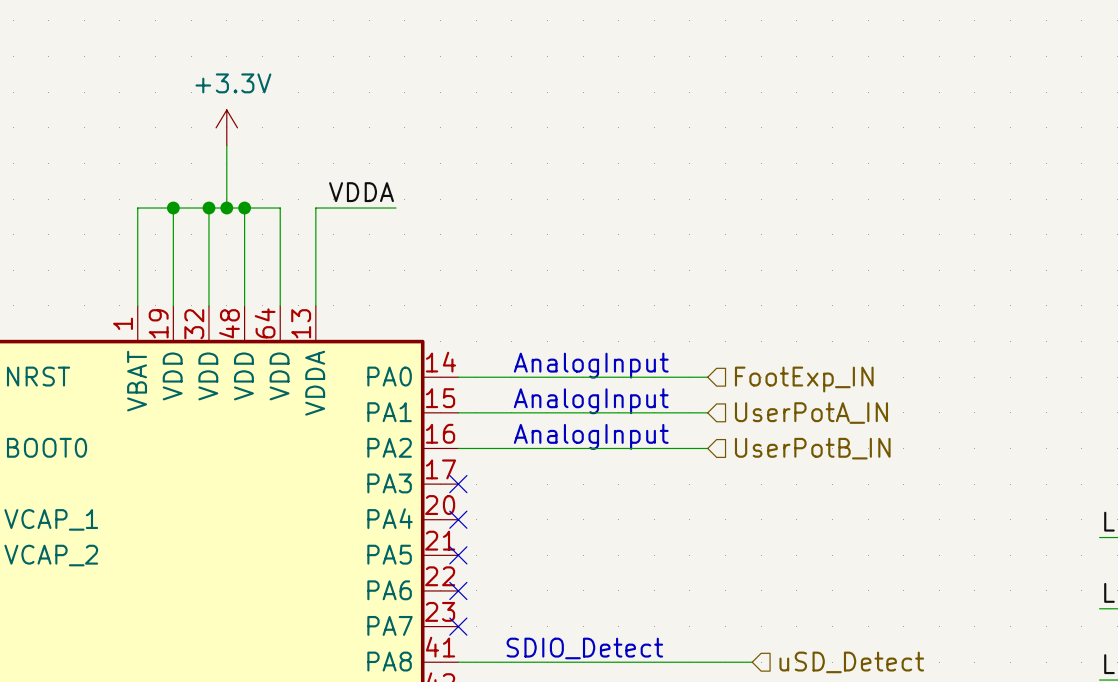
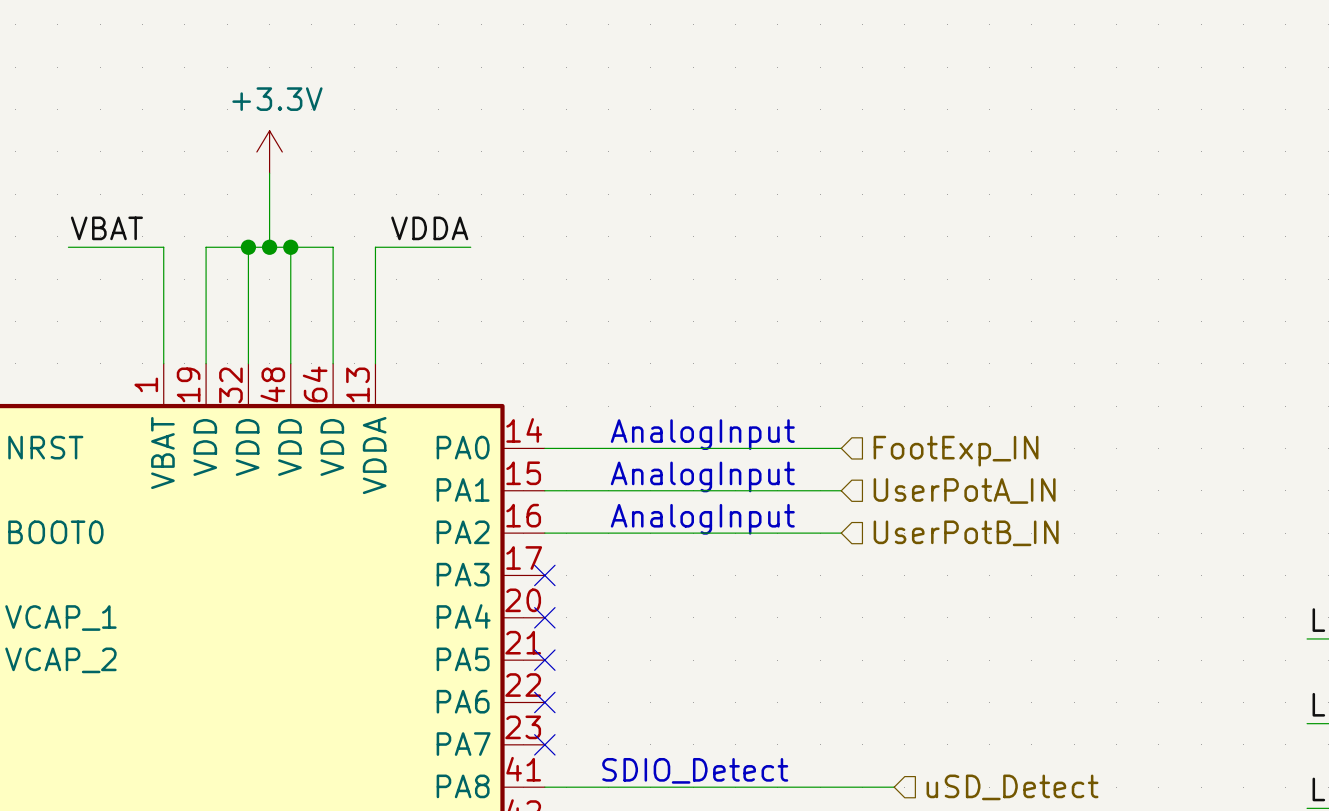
label: none -> VBAT (106, 228)
wire: (137, 208) (173, 208) -> (163, 247) (68, 247)
junction: (173, 208) -> none

